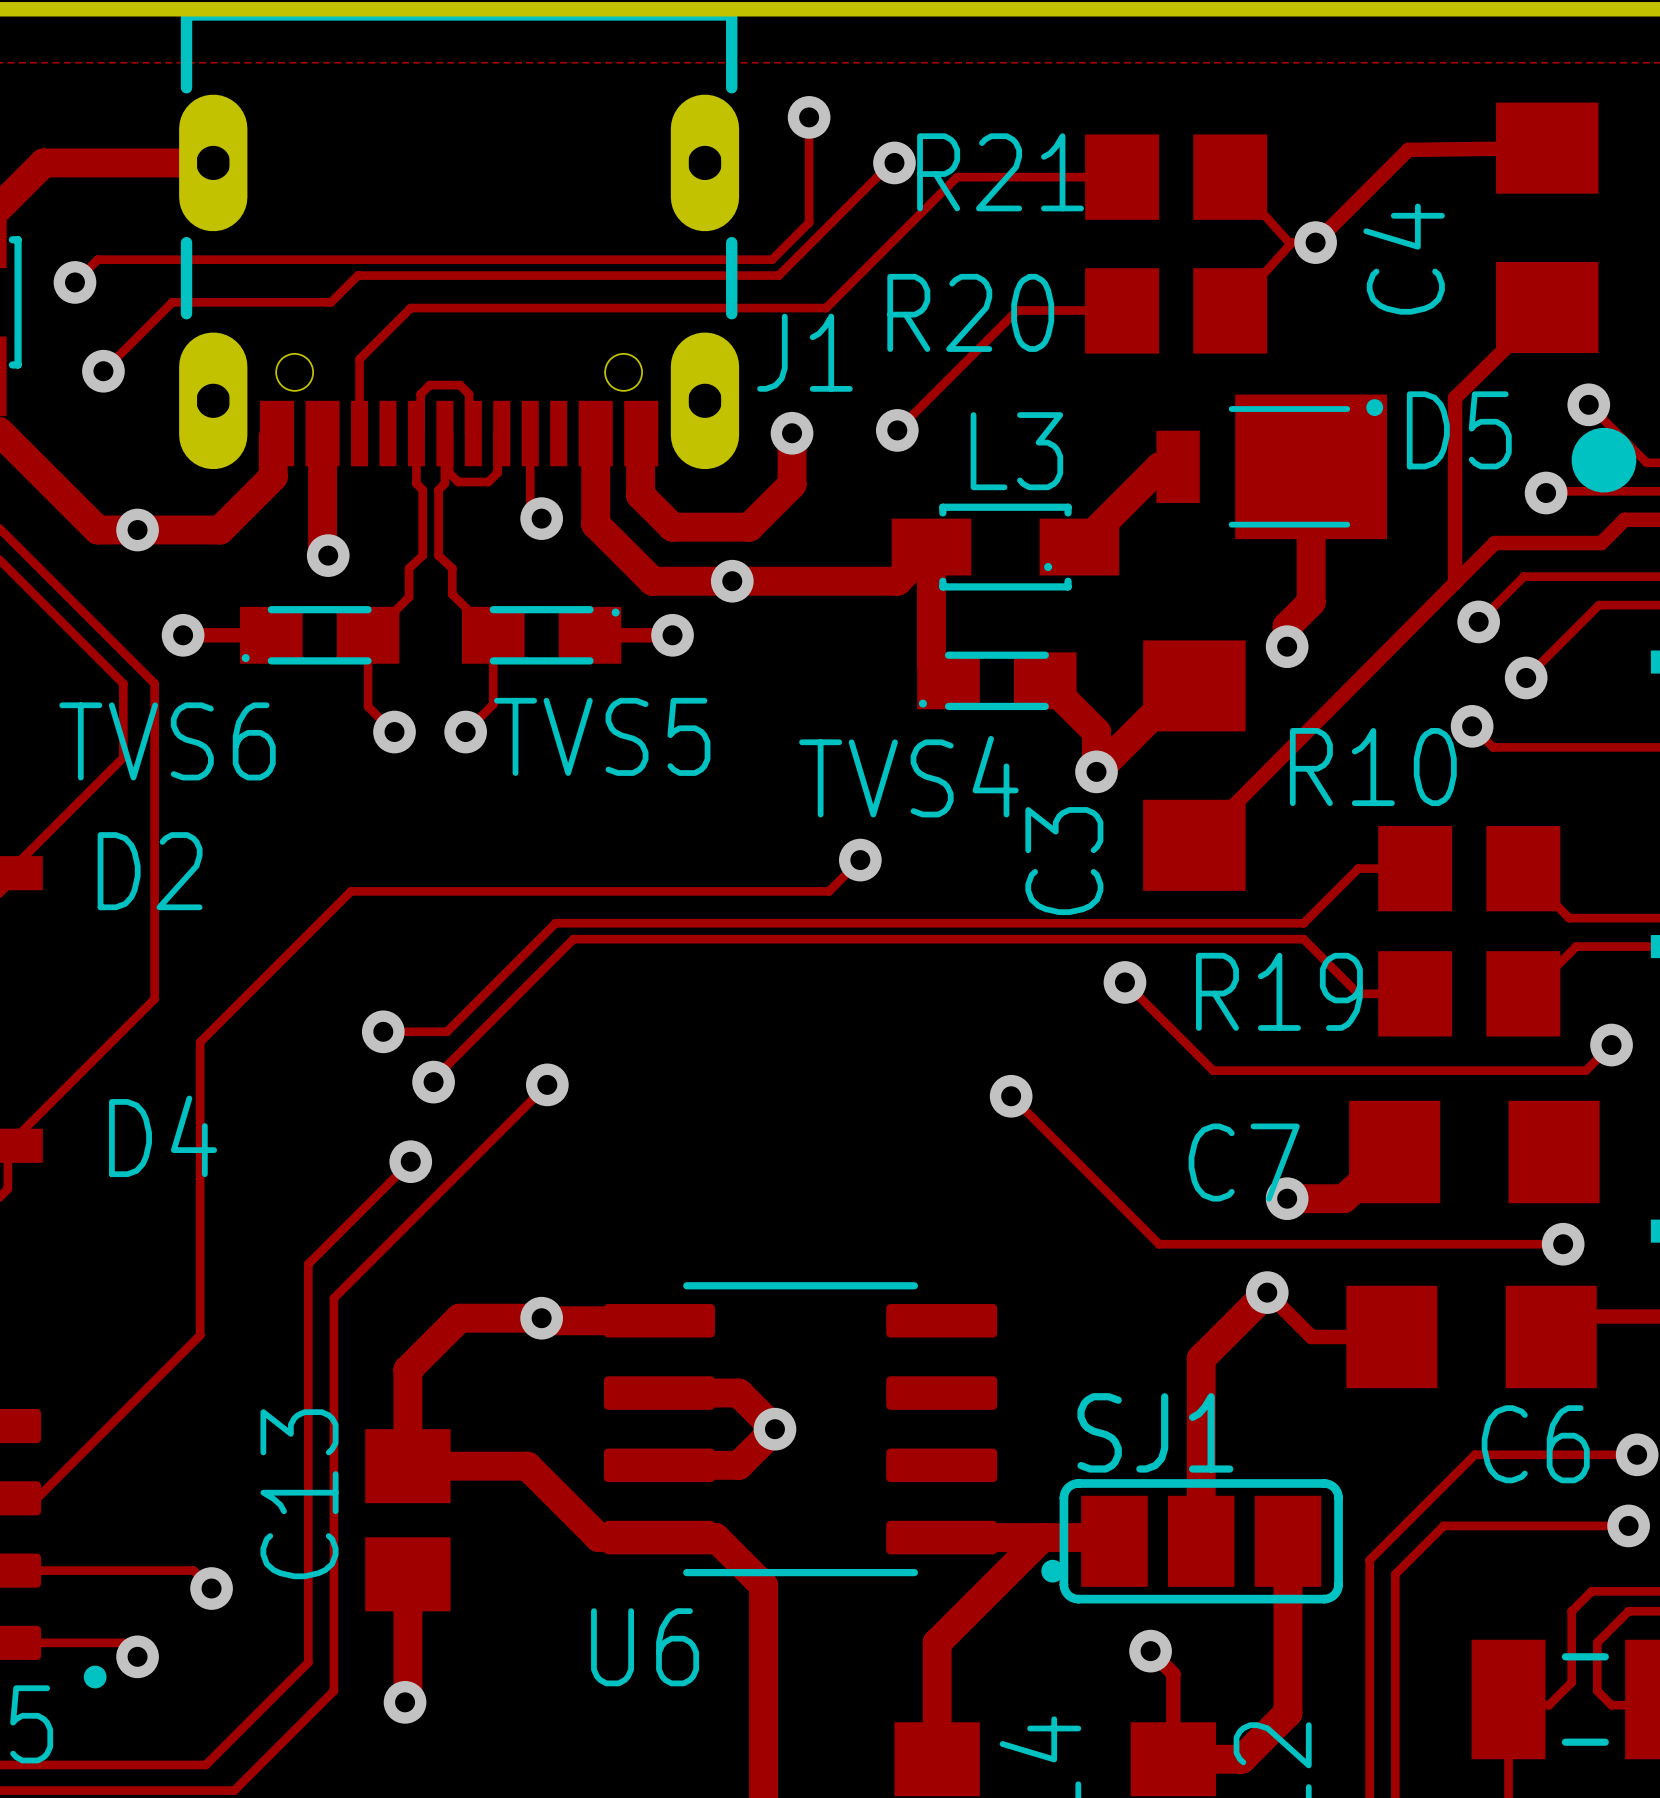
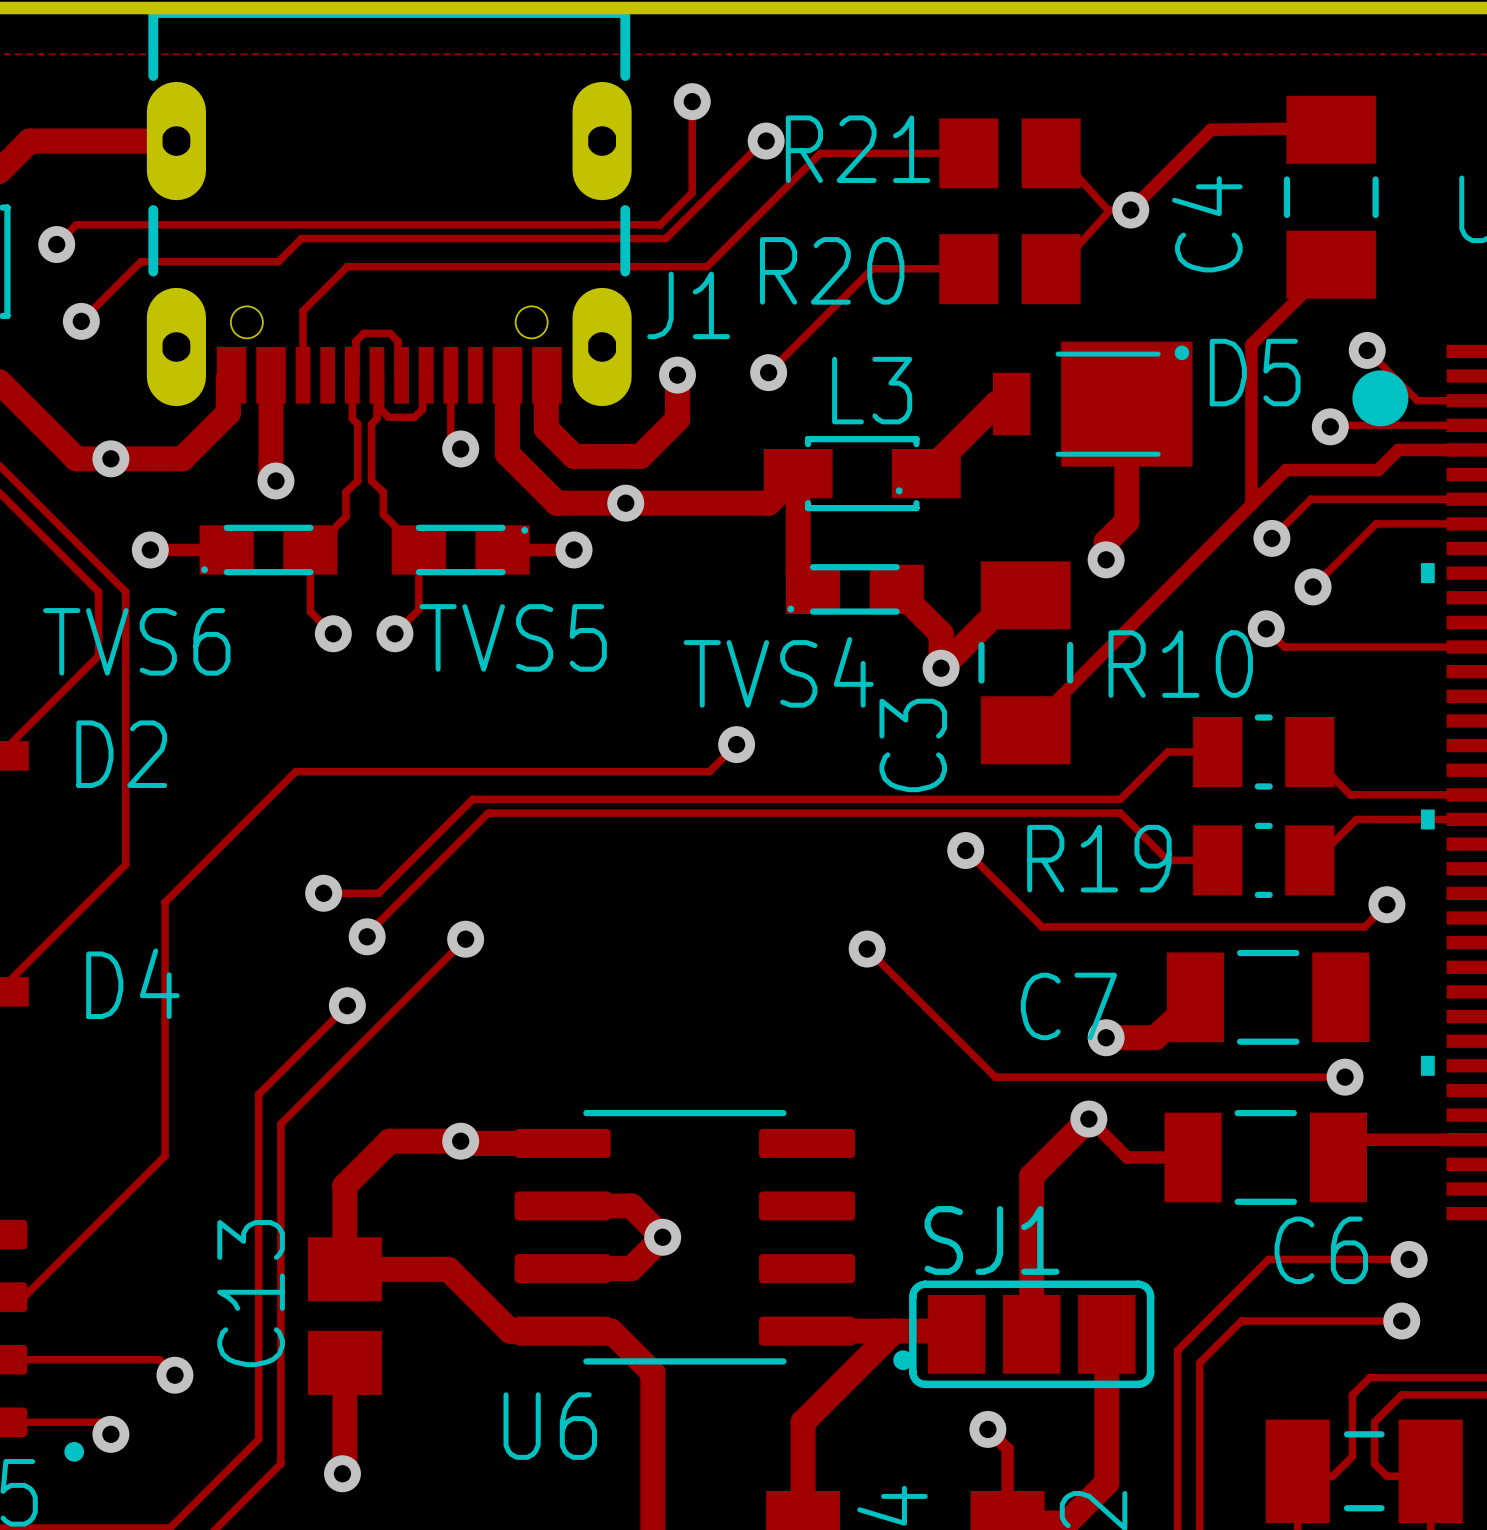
C4 footprint: [1496, 102, 1599, 354] -> [1283, 95, 1379, 299]
R21 footprint: [1085, 134, 1268, 220] -> [939, 118, 1081, 189]
R20 footprint: [1085, 268, 1268, 354] -> [939, 234, 1081, 305]
C3 footprint: [1143, 640, 1246, 891] -> [978, 561, 1074, 765]
R10 footprint: [1378, 825, 1561, 912] -> [1193, 714, 1335, 790]
R19 footprint: [1378, 951, 1561, 1037] -> [1193, 822, 1335, 898]
C7 footprint: [1349, 1100, 1600, 1204] -> [1166, 949, 1370, 1045]
C6 footprint: [1346, 1285, 1597, 1389] -> [1164, 1109, 1367, 1205]

